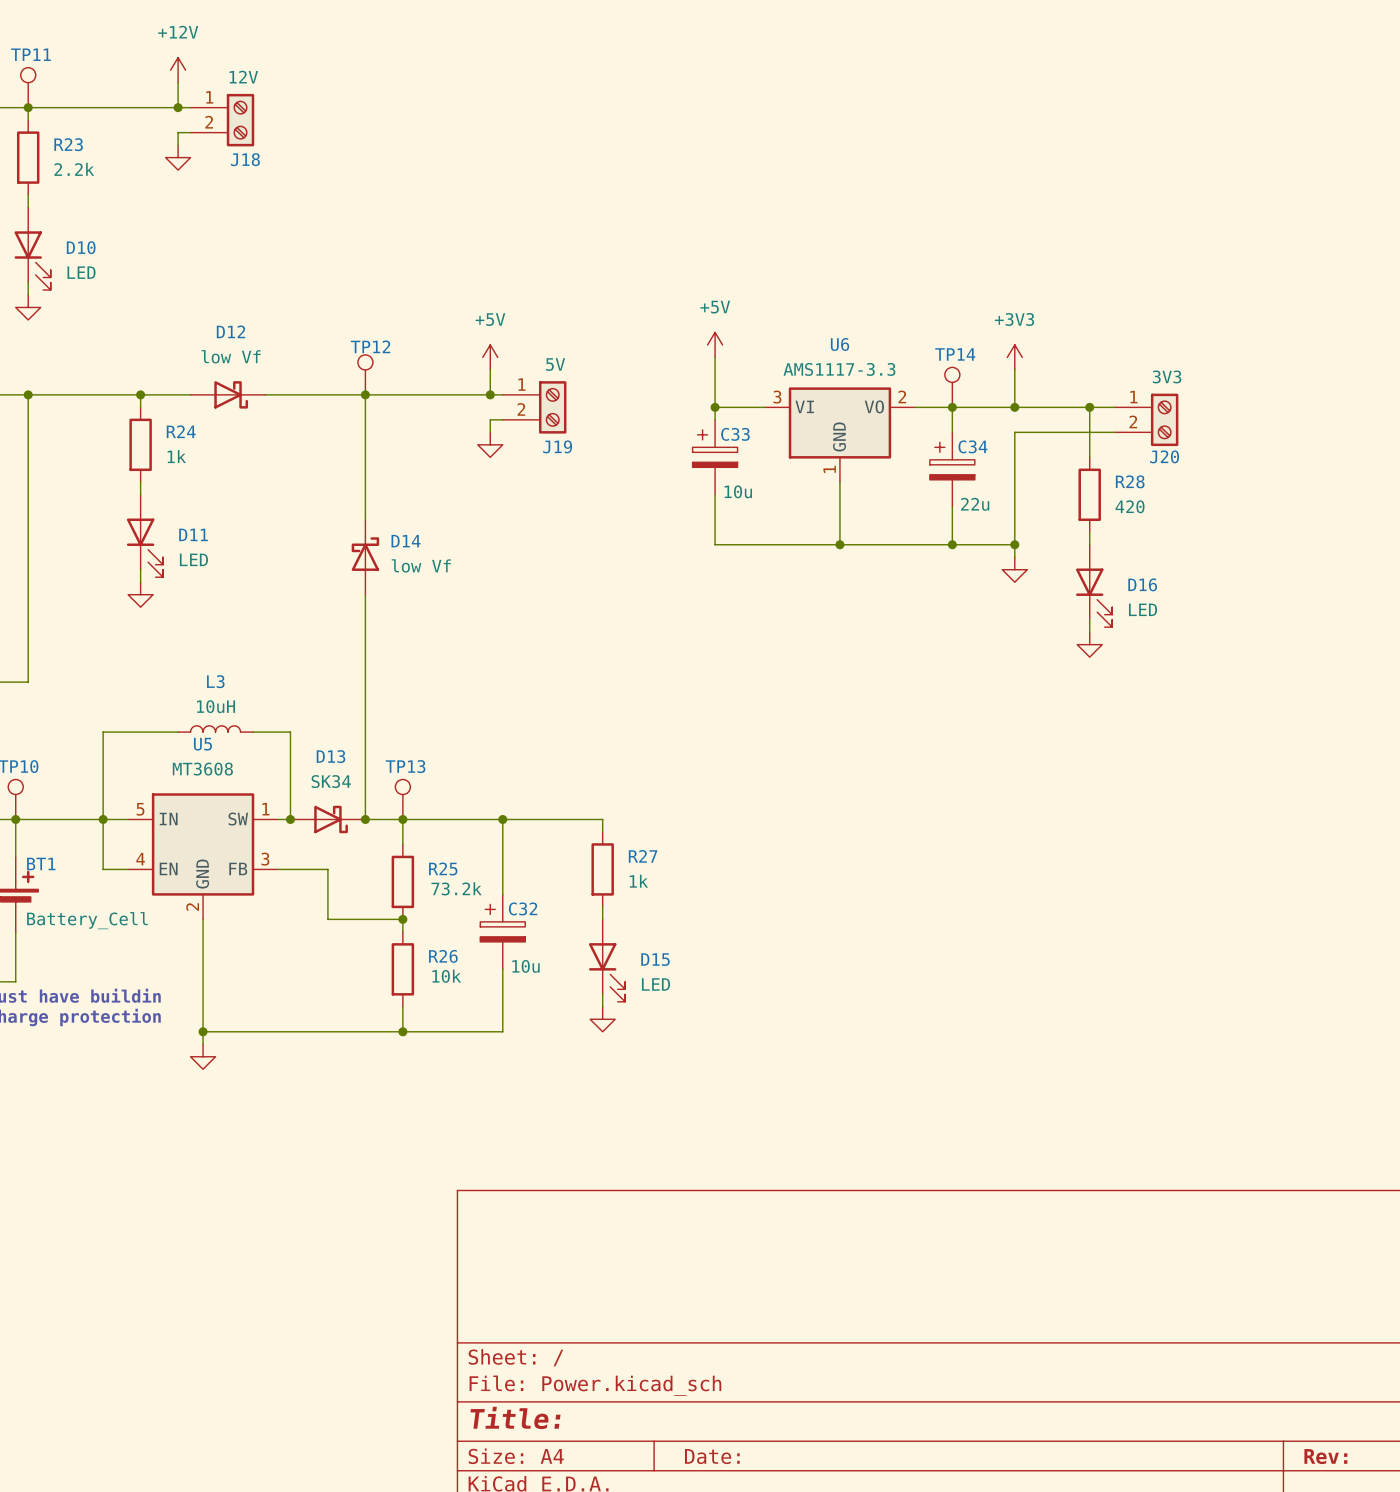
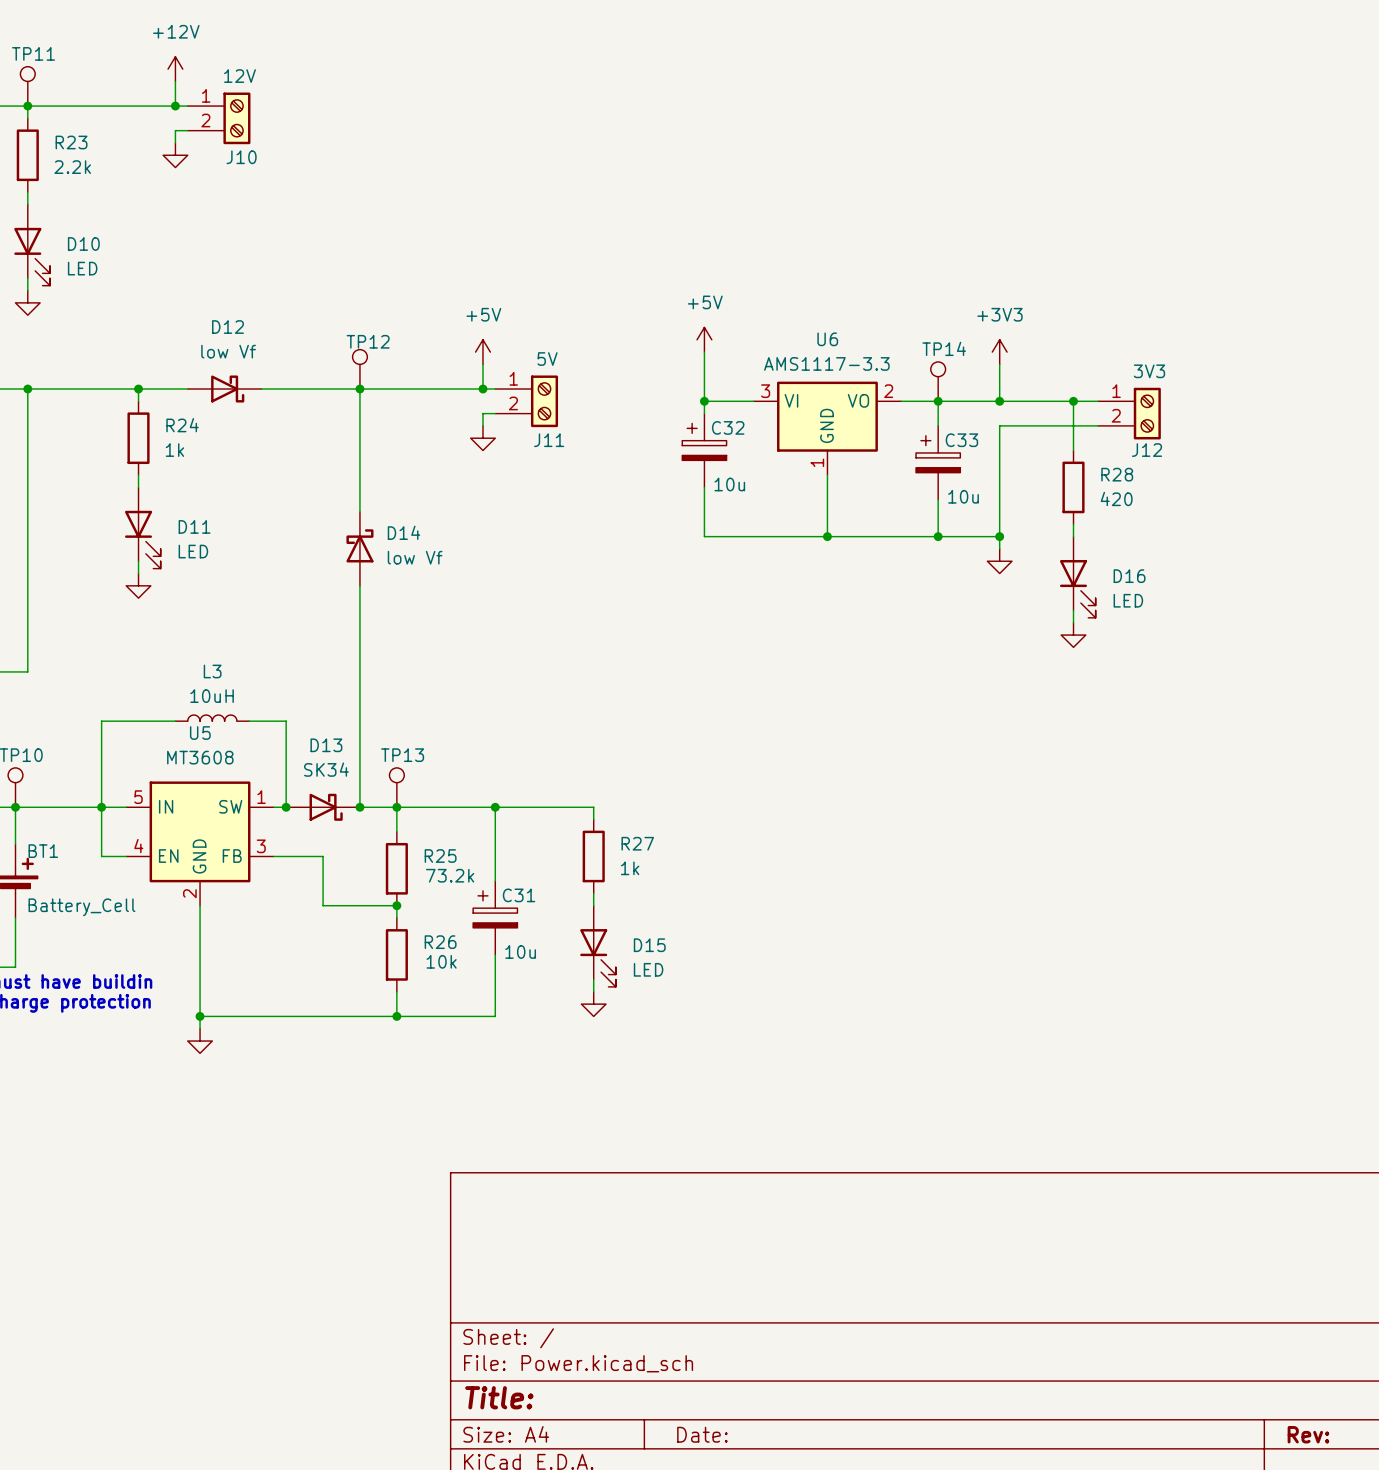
J18 name: J18 (245, 159) -> J10 (241, 157)
C33 name: C33 (735, 434) -> C32 (728, 427)
J19 name: J19 (557, 446) -> J11 (549, 440)
C34 name: C34 (972, 446) -> C33 (961, 440)
J20 name: J20 (1164, 456) -> J12 (1147, 450)
C34 value: 22u (975, 504) -> 10u (963, 496)
C32 name: C32 (523, 908) -> C31 (519, 895)

